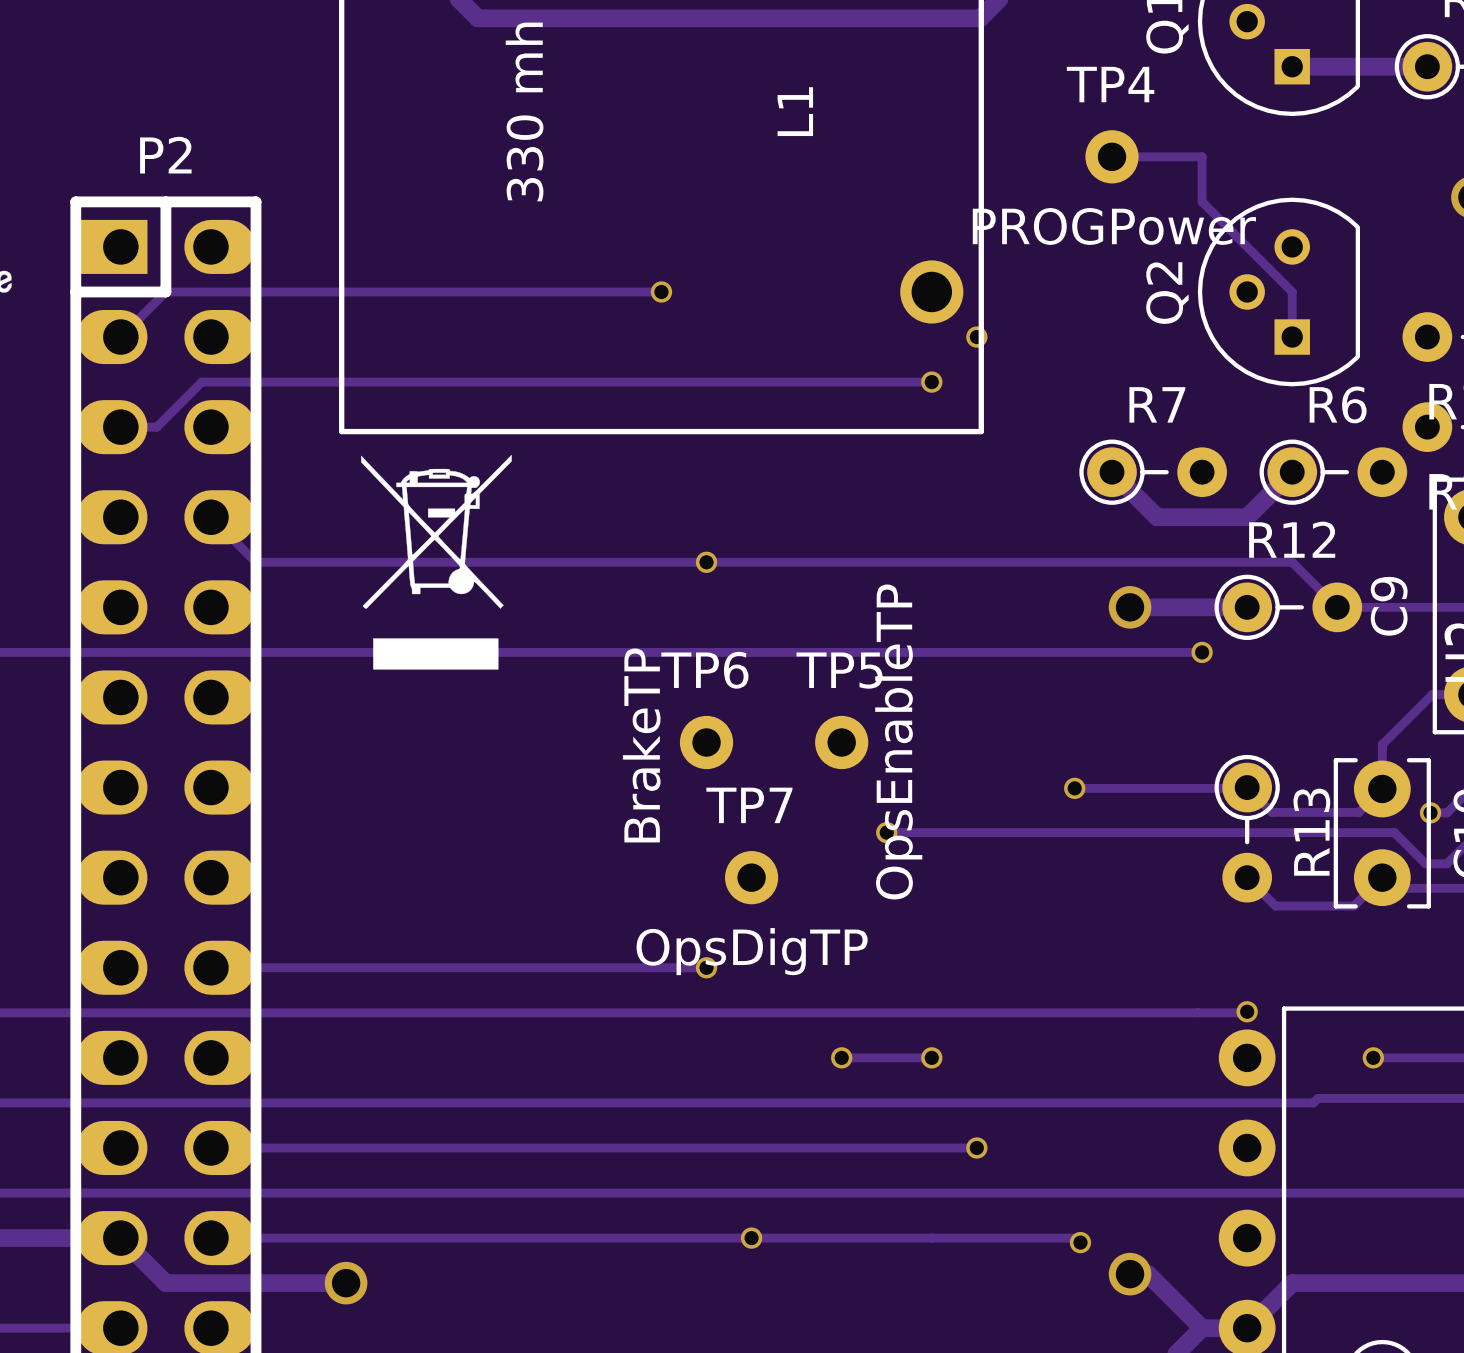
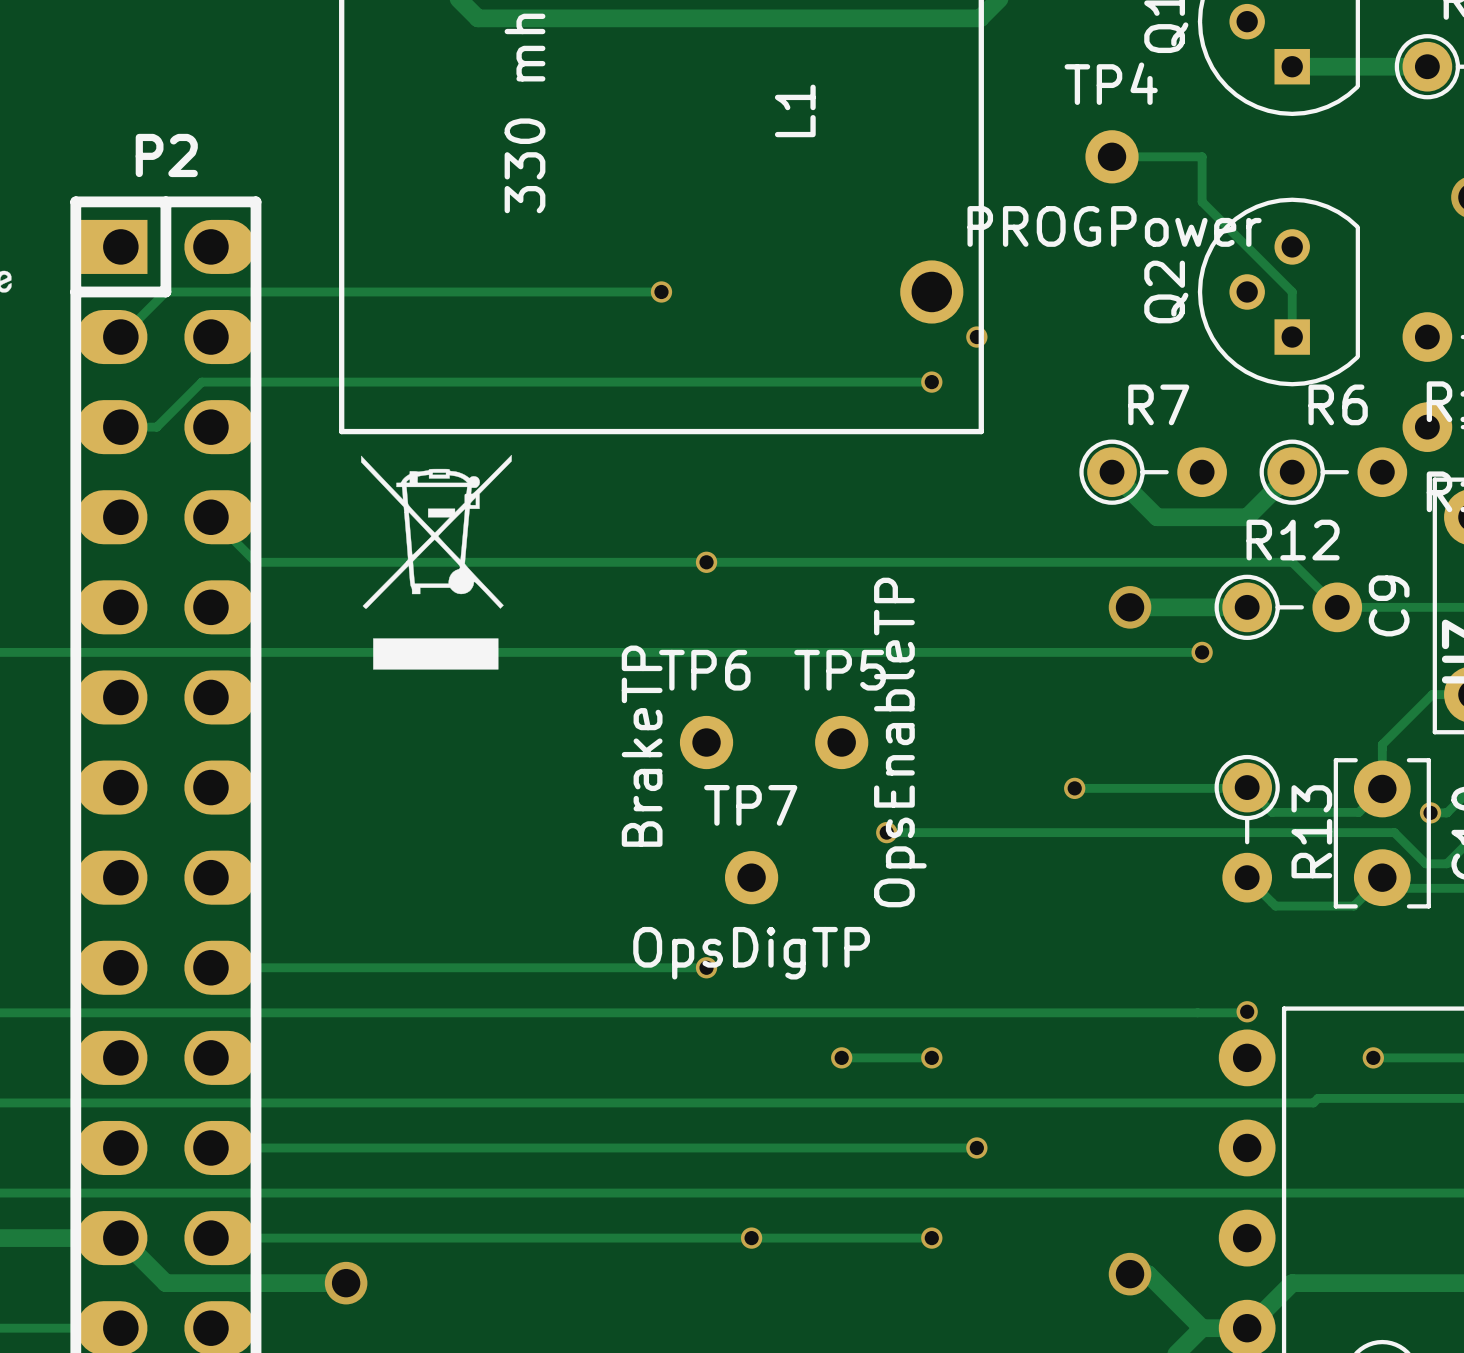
track: (931, 1238) (1075, 1238) (1080, 1242) -> none
via: none -> (931, 1238)
via: (1080, 1242) -> none

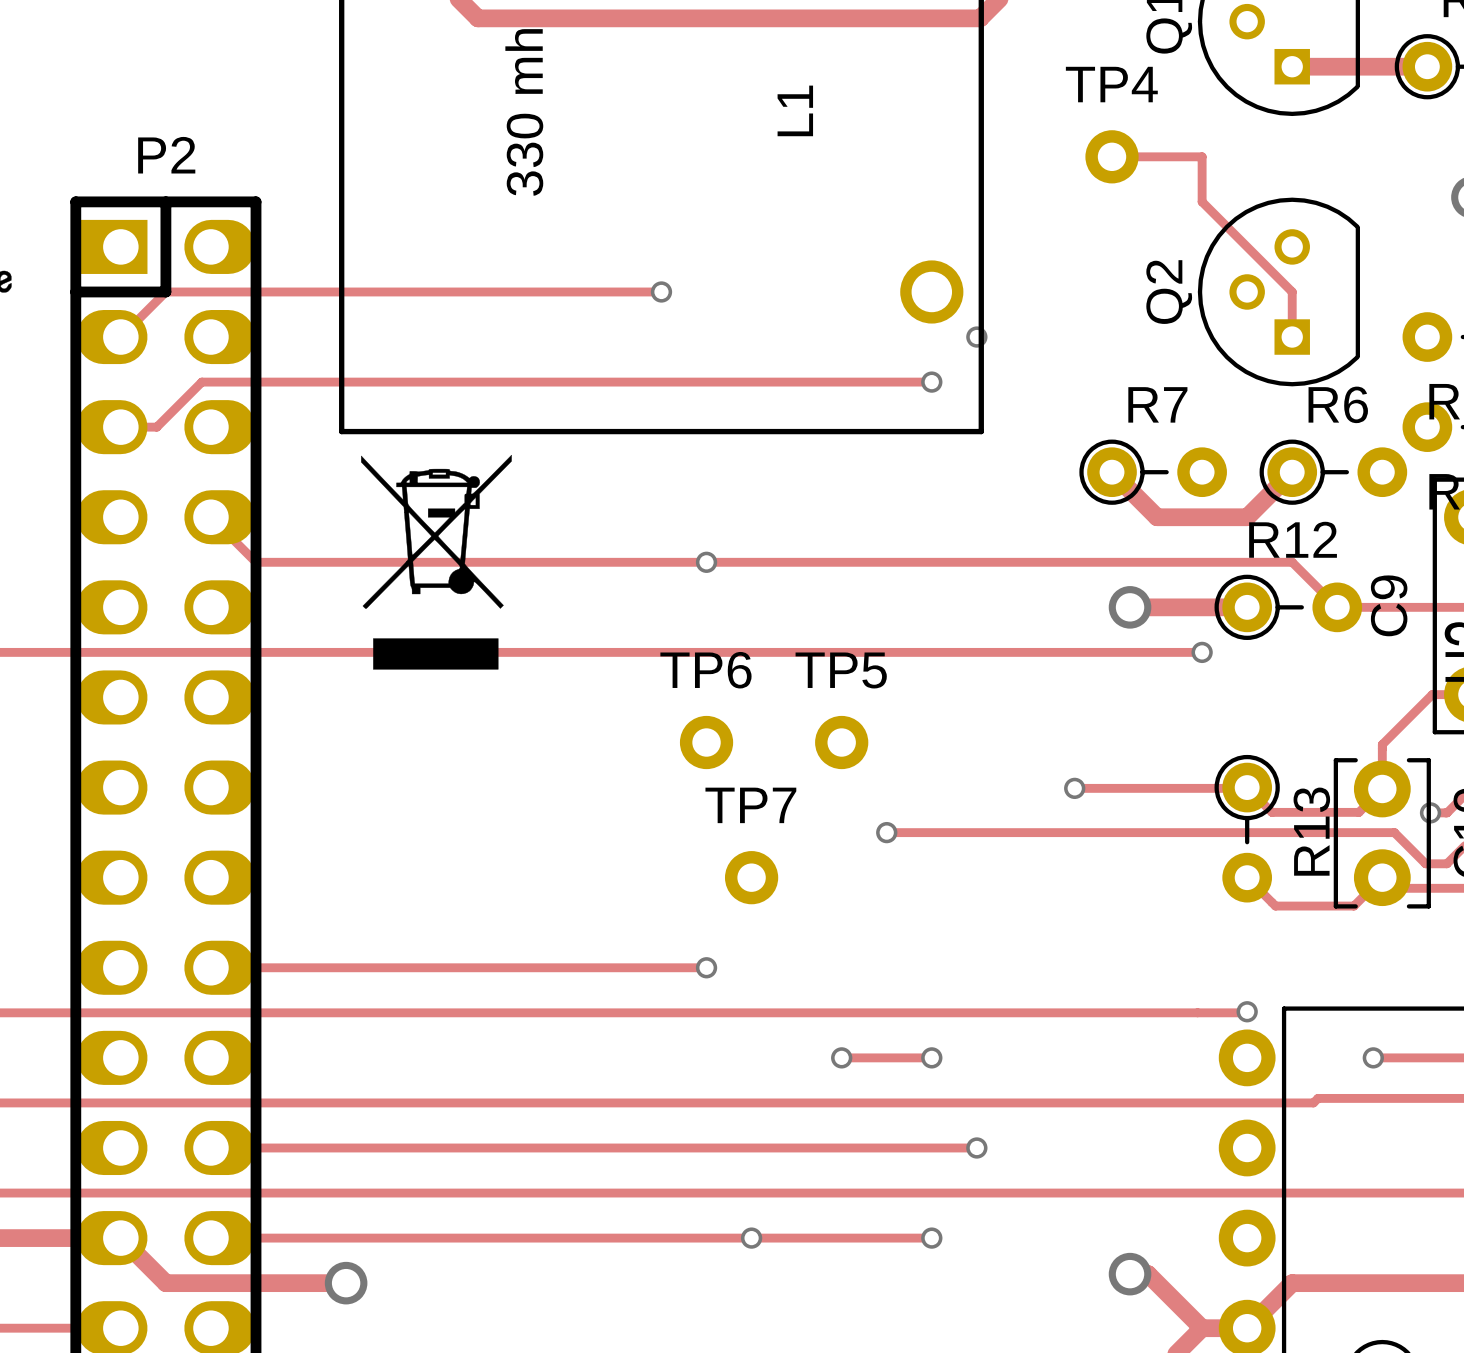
TP4 value: PROGPower (1114, 226) -> none
TP5 value: OpsEnableTP (900, 742) -> none
TP6 value: BrakeTP (642, 746) -> none
TP7 value: OpsDigTP (751, 953) -> none

